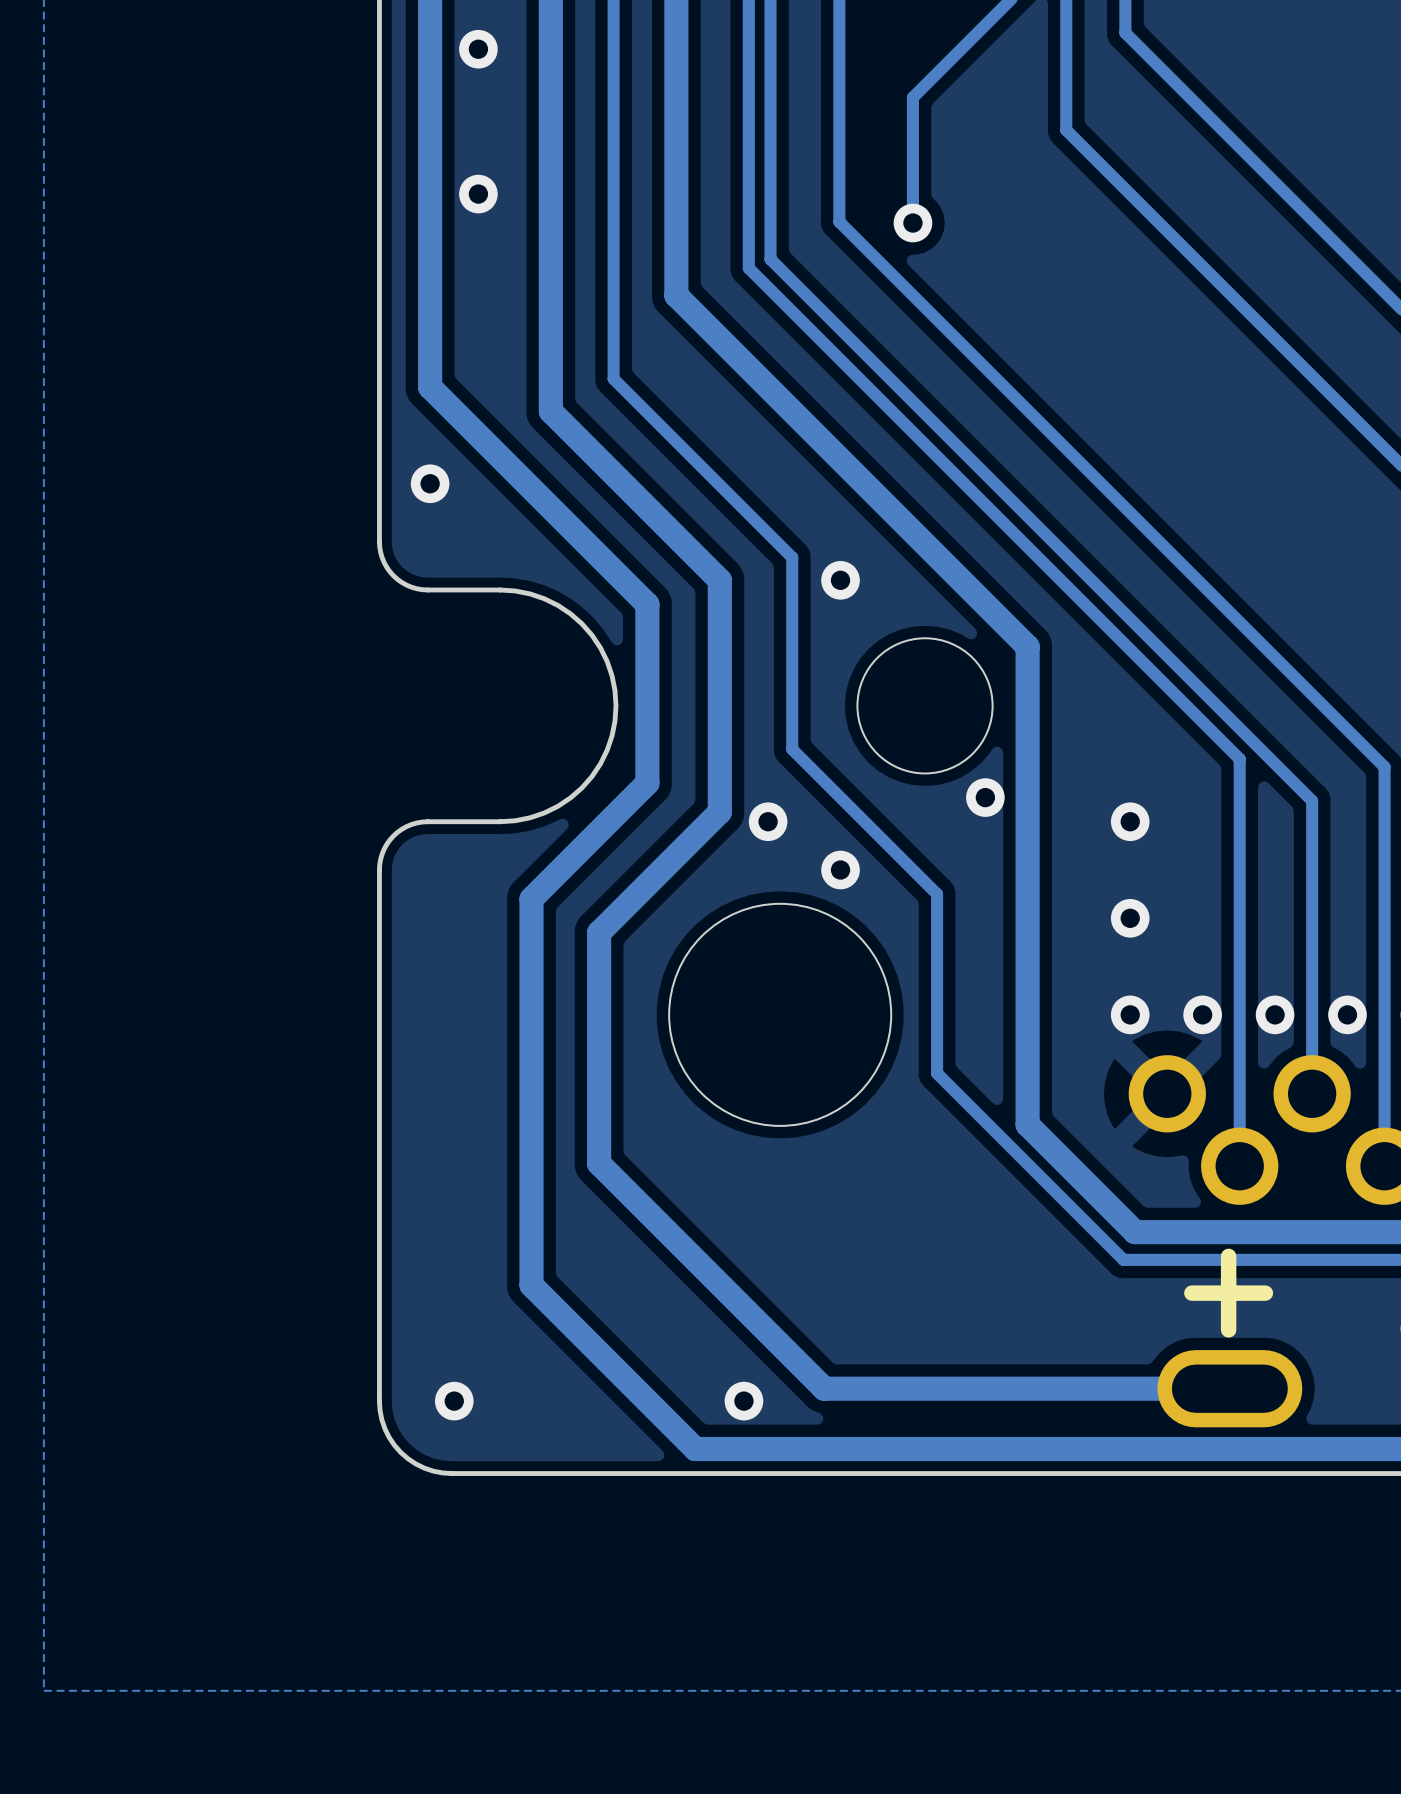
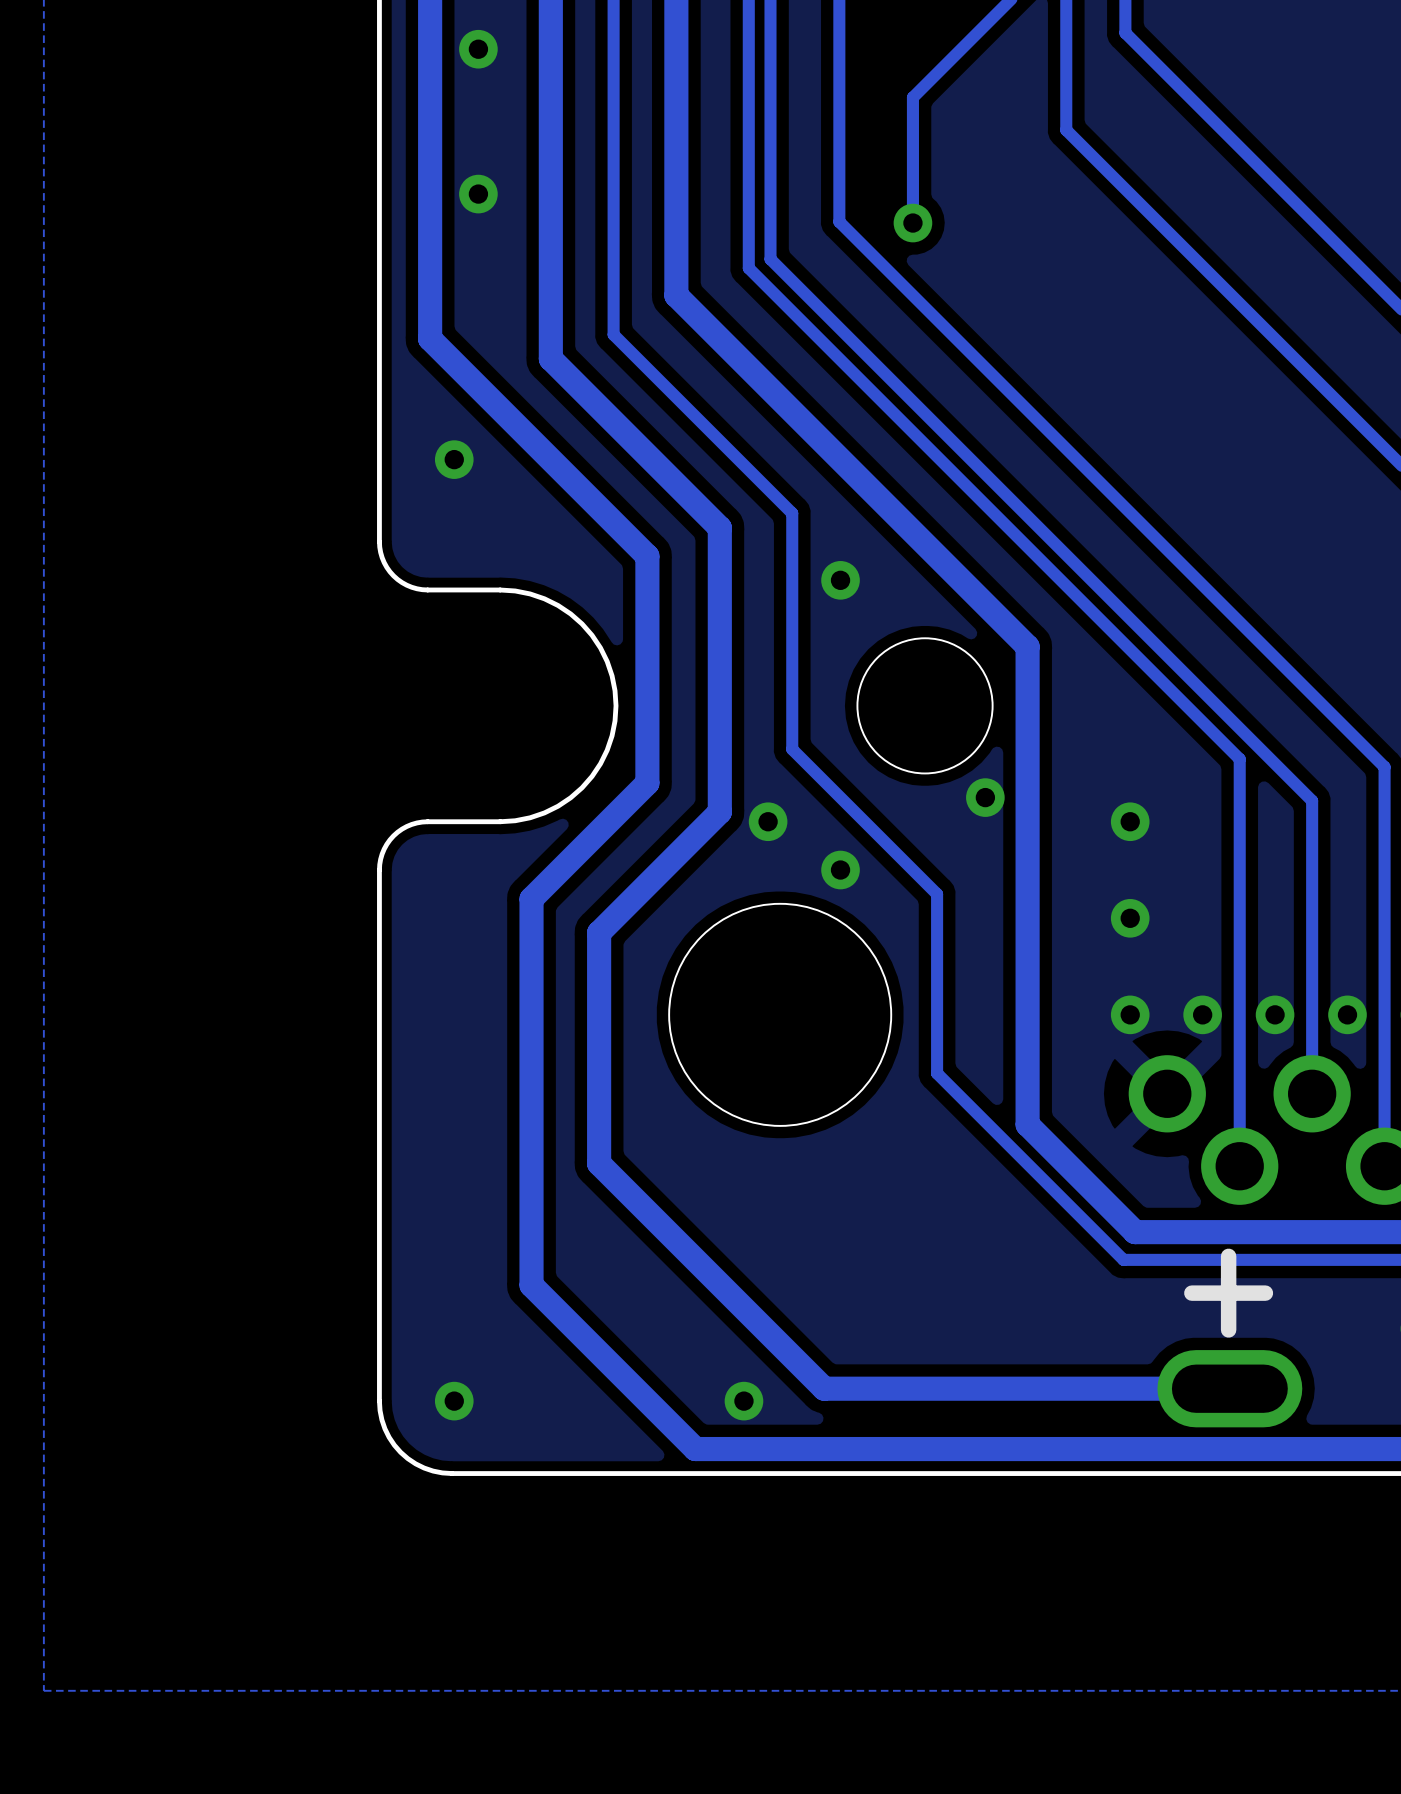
track: (613, 334) (613, 378) (792, 557) -> (613, 334) (792, 513) (792, 557)
track: (430, 338) (430, 387) (647, 604) -> (430, 338) (647, 556) (647, 604)
track: (550, 358) (550, 411) (719, 580) -> (550, 358) (719, 527) (719, 580)
via position: (430, 483) -> (454, 459)

